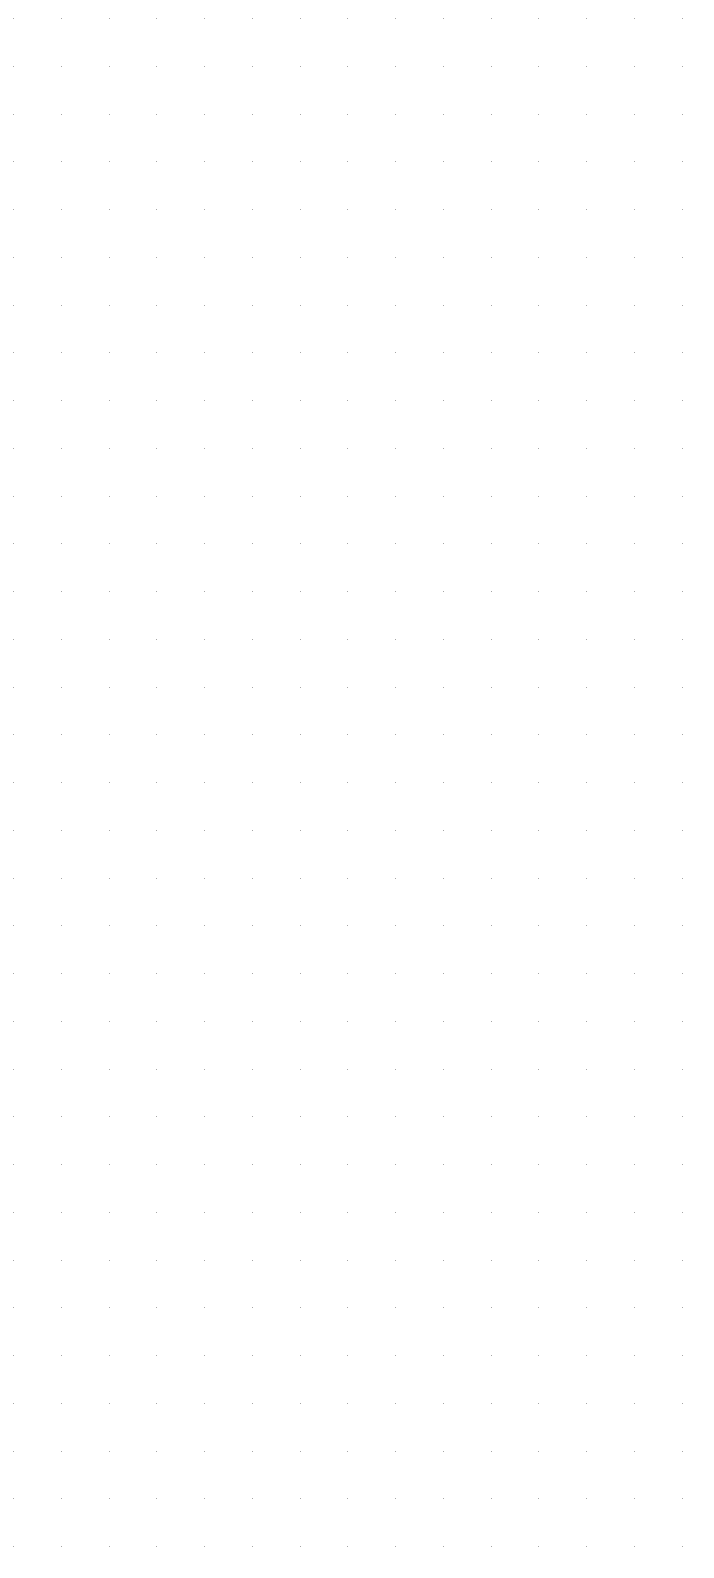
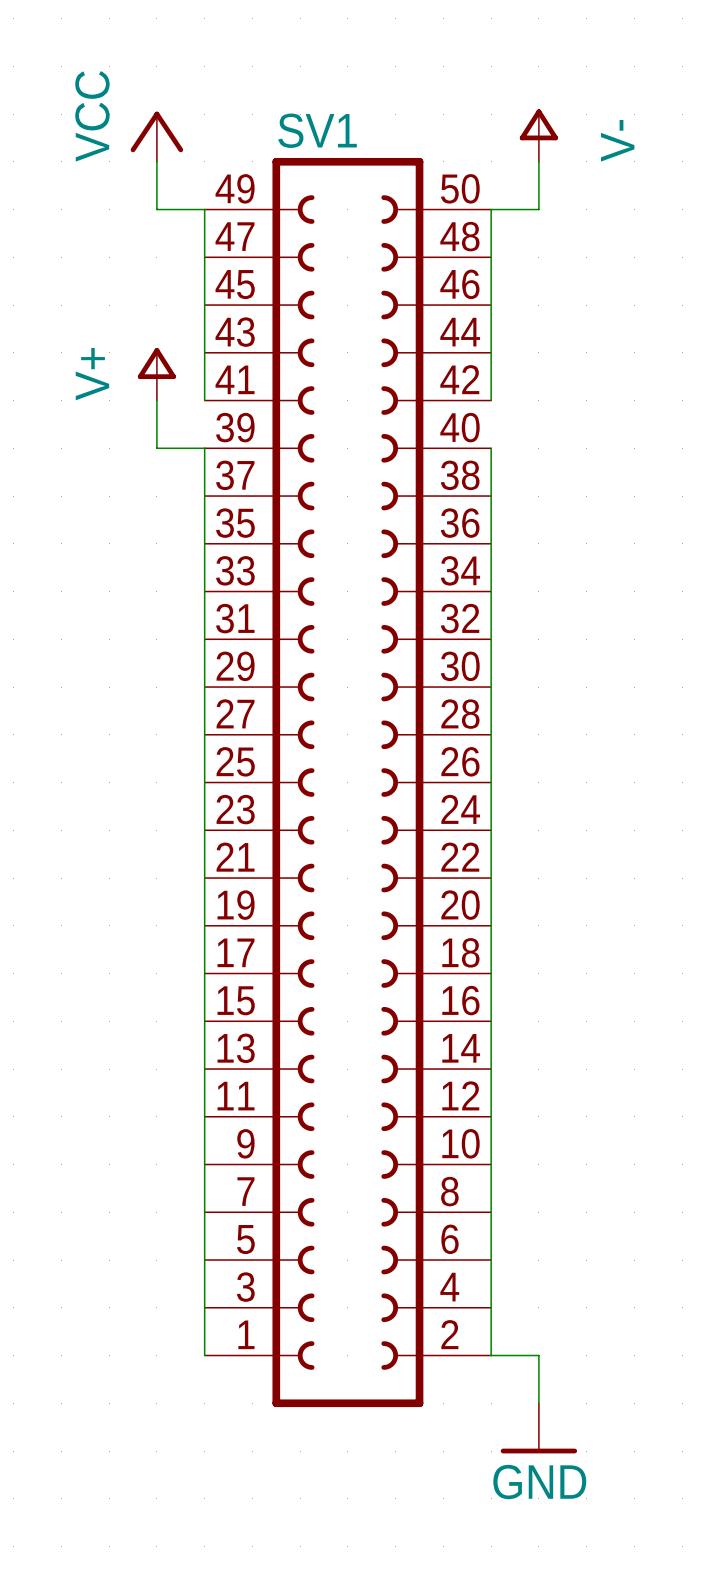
power symbol: none -> V- (538, 135)
power symbol: none -> VCC (156, 136)
wire: none -> (156, 161) (156, 209) (204, 209) (204, 400)
wire: none -> (538, 161) (538, 209) (491, 209) (491, 400)
power symbol: none -> V+ (156, 374)
wire: none -> (156, 400) (156, 448) (204, 448) (204, 1355)
wire: none -> (491, 448) (491, 1355) (538, 1355) (538, 1403)
SV1: none -> (347, 782)
power symbol: none -> GND (538, 1428)

